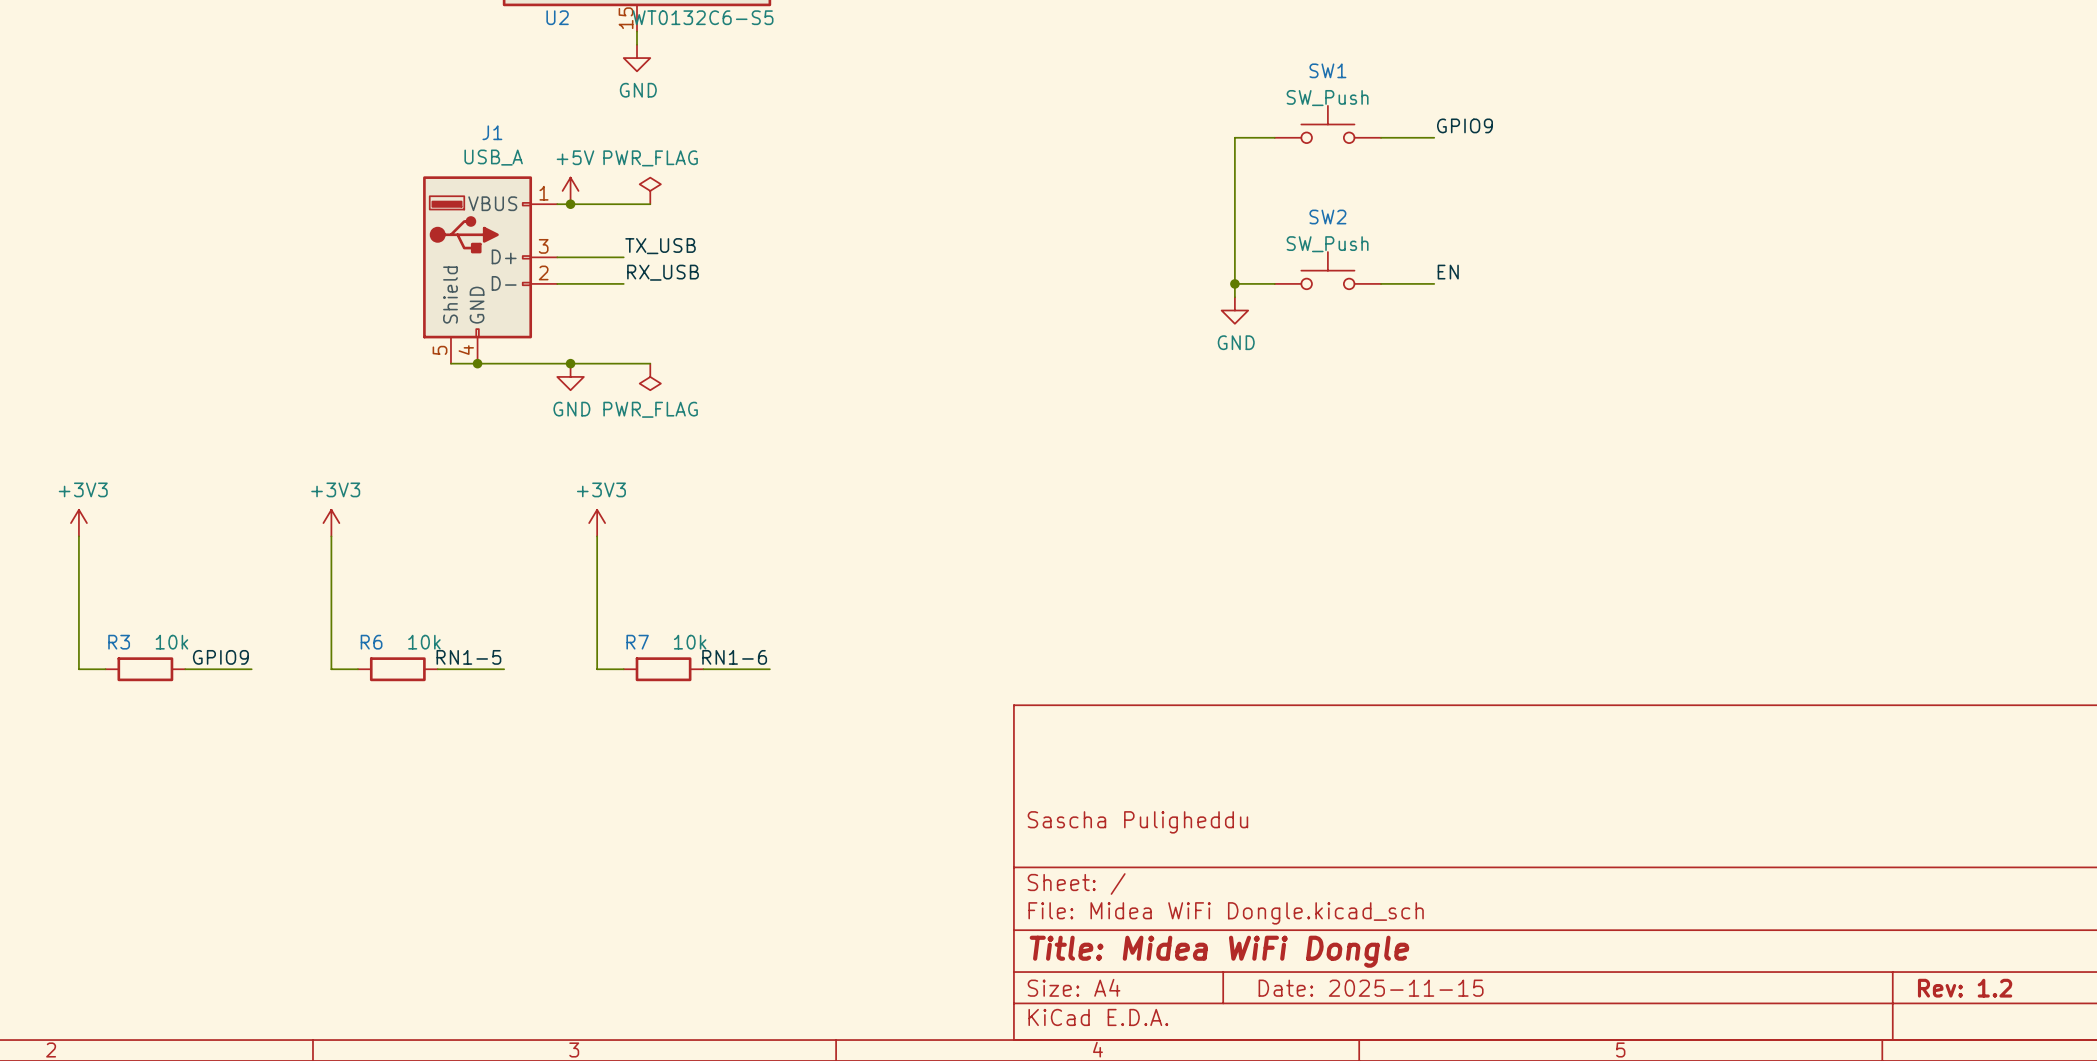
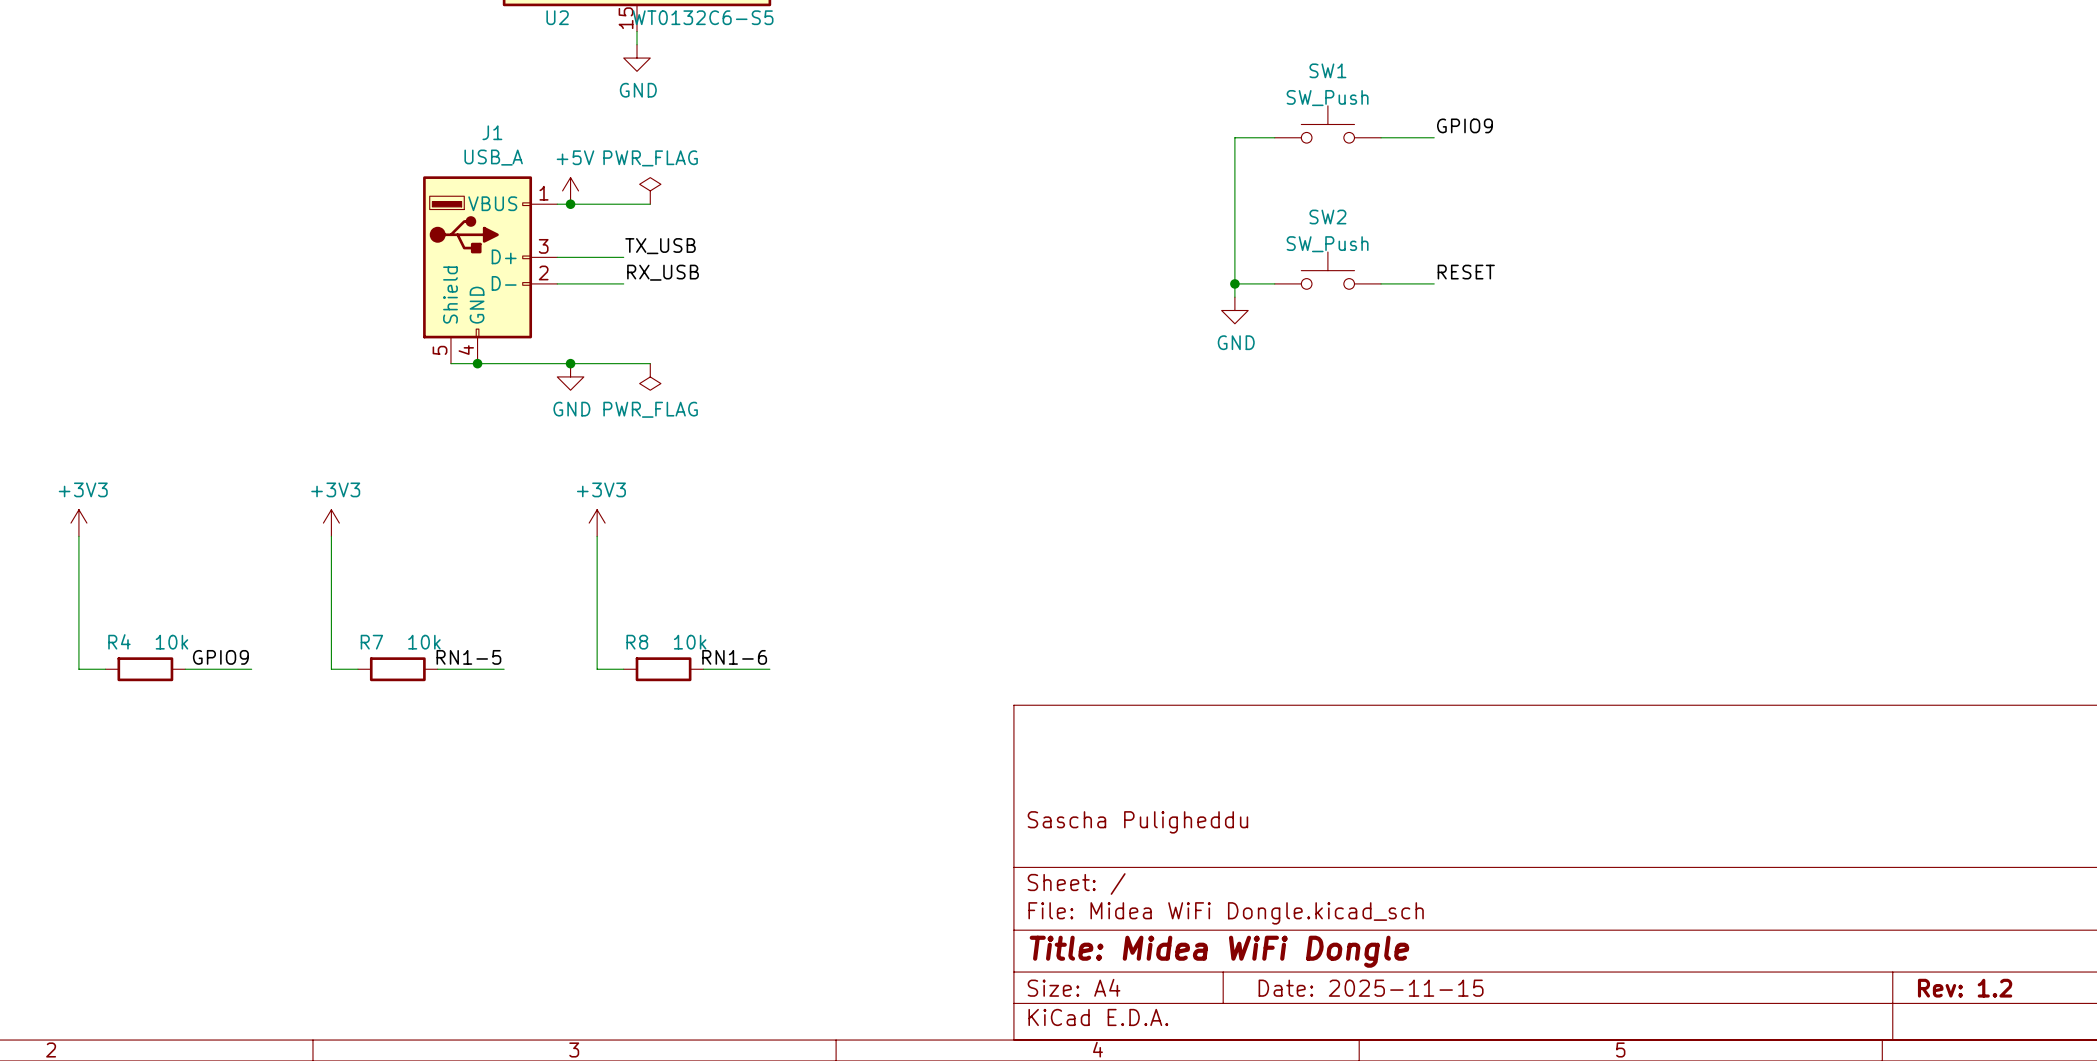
label: EN (1448, 272) -> RESET (1466, 272)
R3 name: R3 (119, 642) -> R4 (119, 641)
R6 name: R6 (371, 642) -> R7 (371, 642)
R7 name: R7 (637, 642) -> R8 (637, 642)

